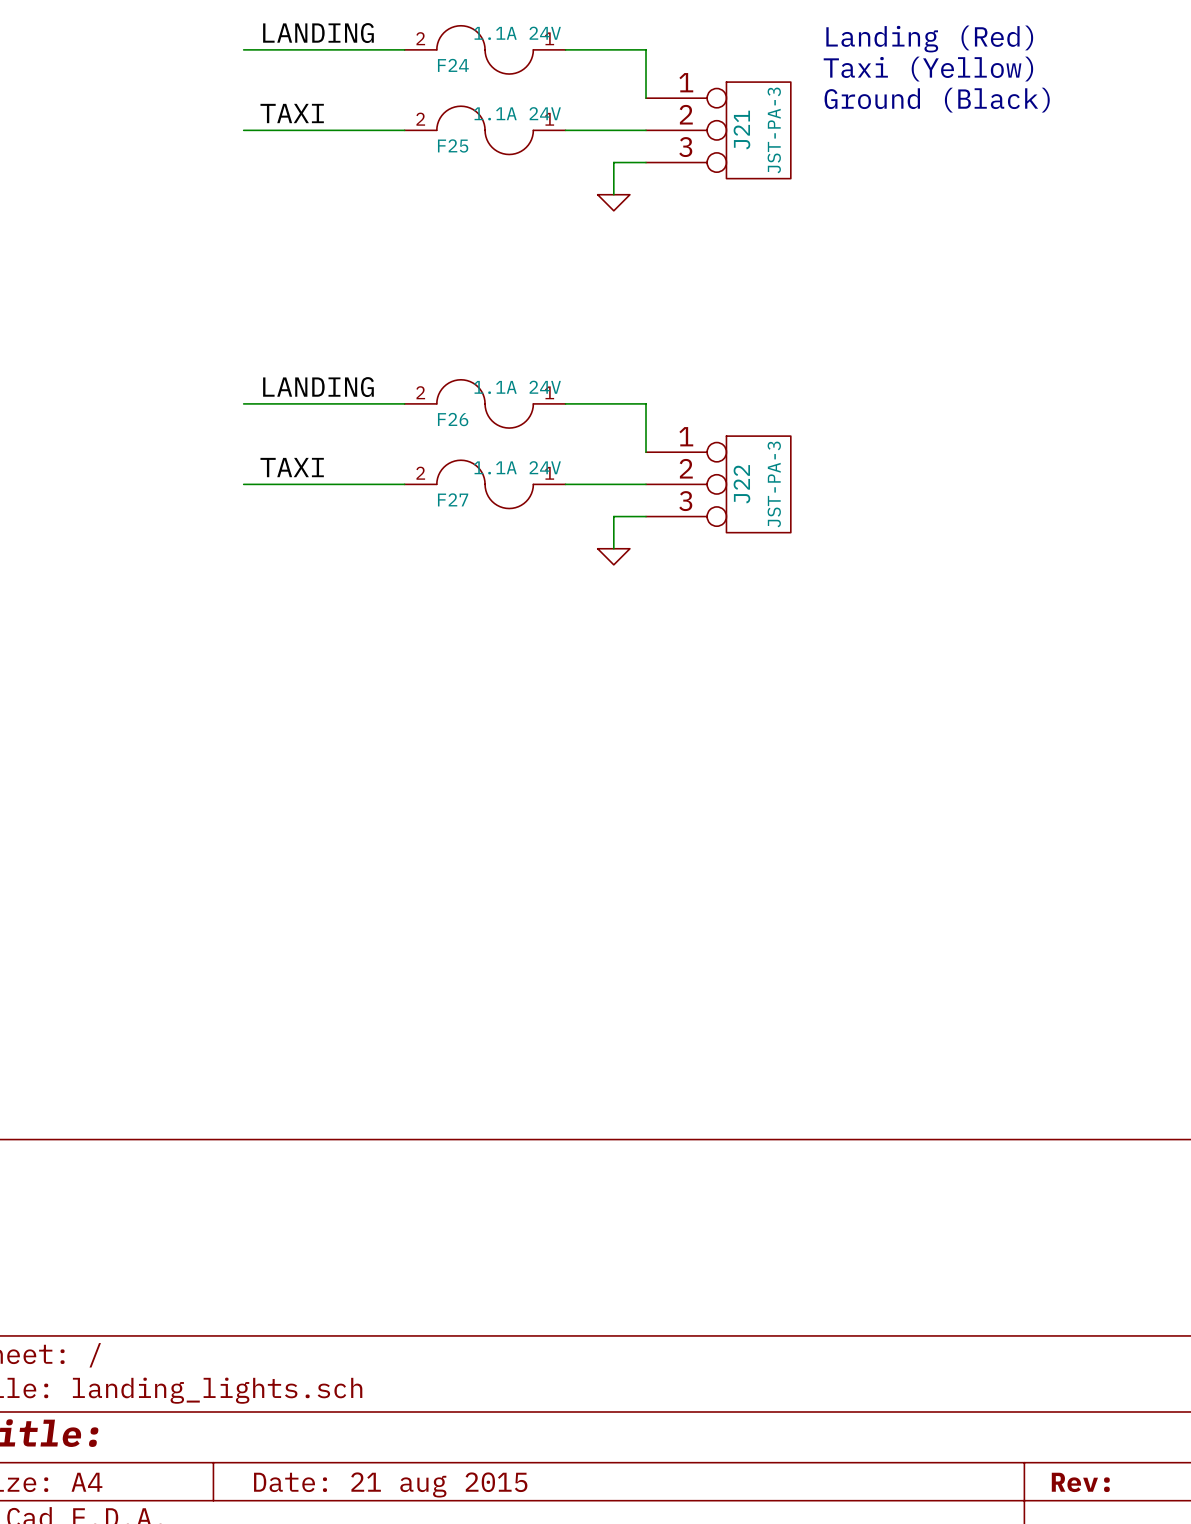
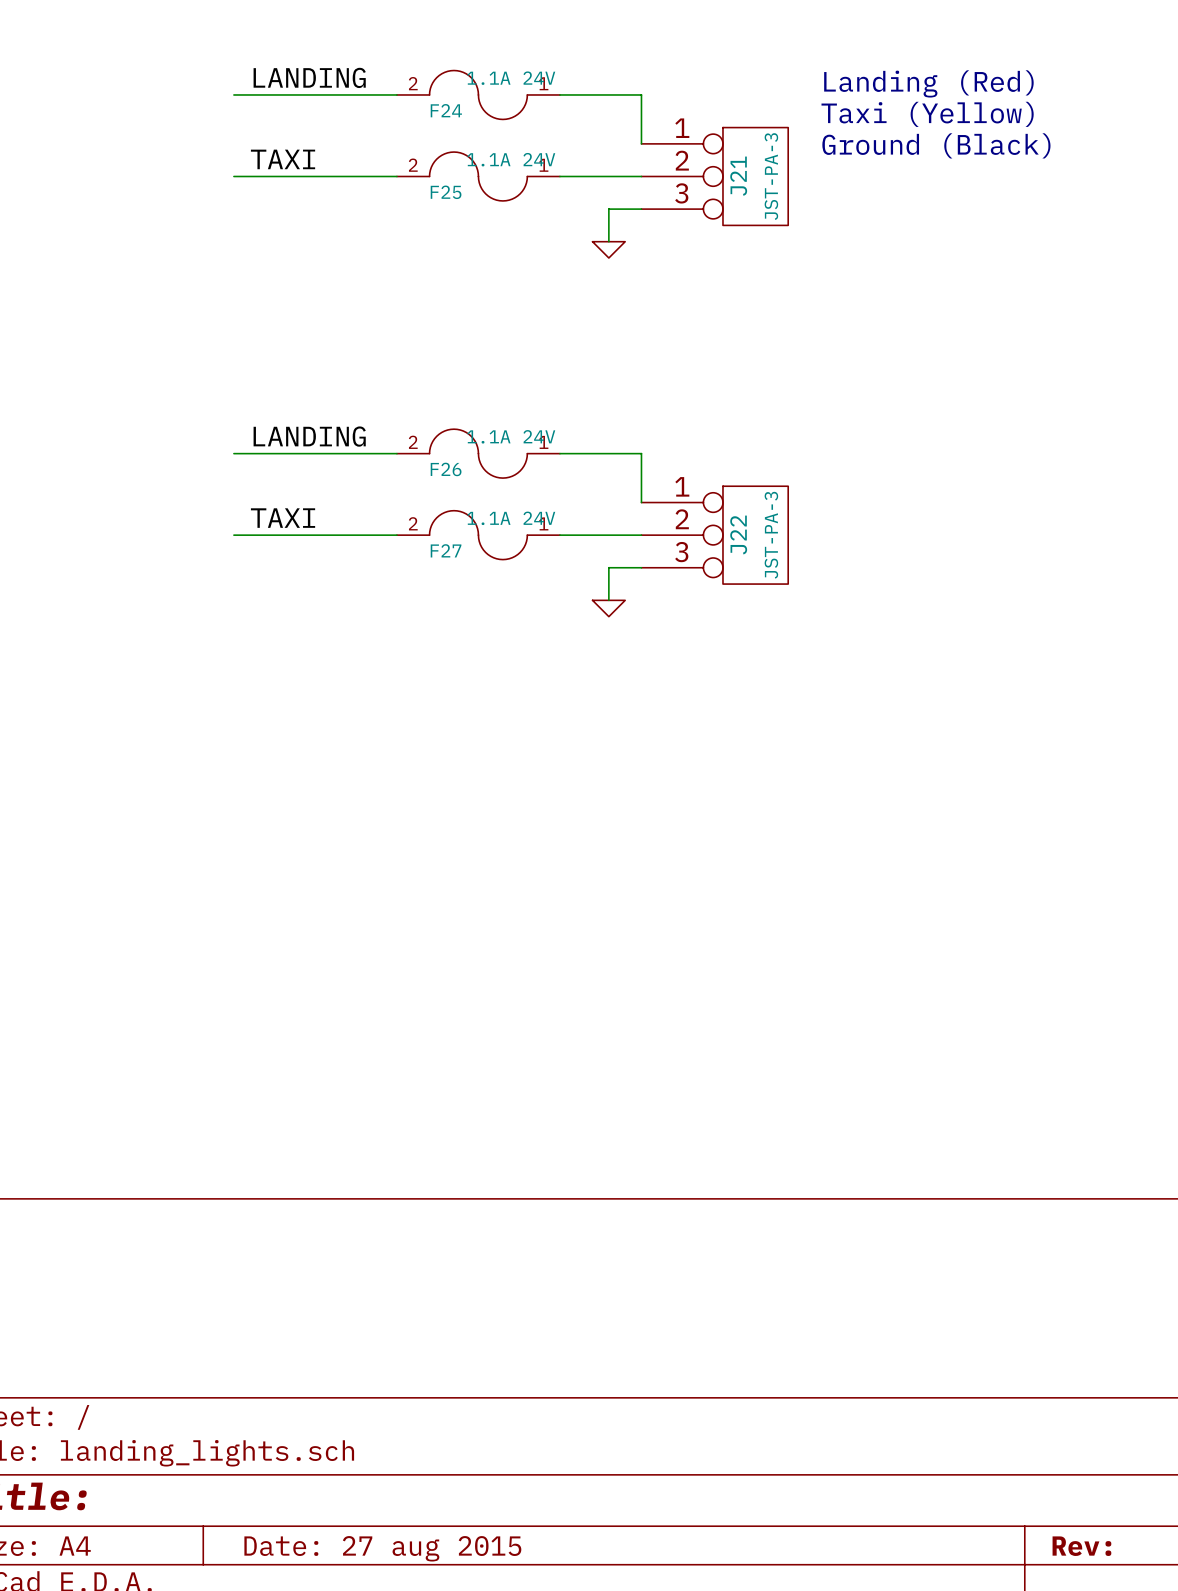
title block: Date: 21 aug 2015 (390, 1484) -> Date: 27 aug 2015 (382, 1548)

